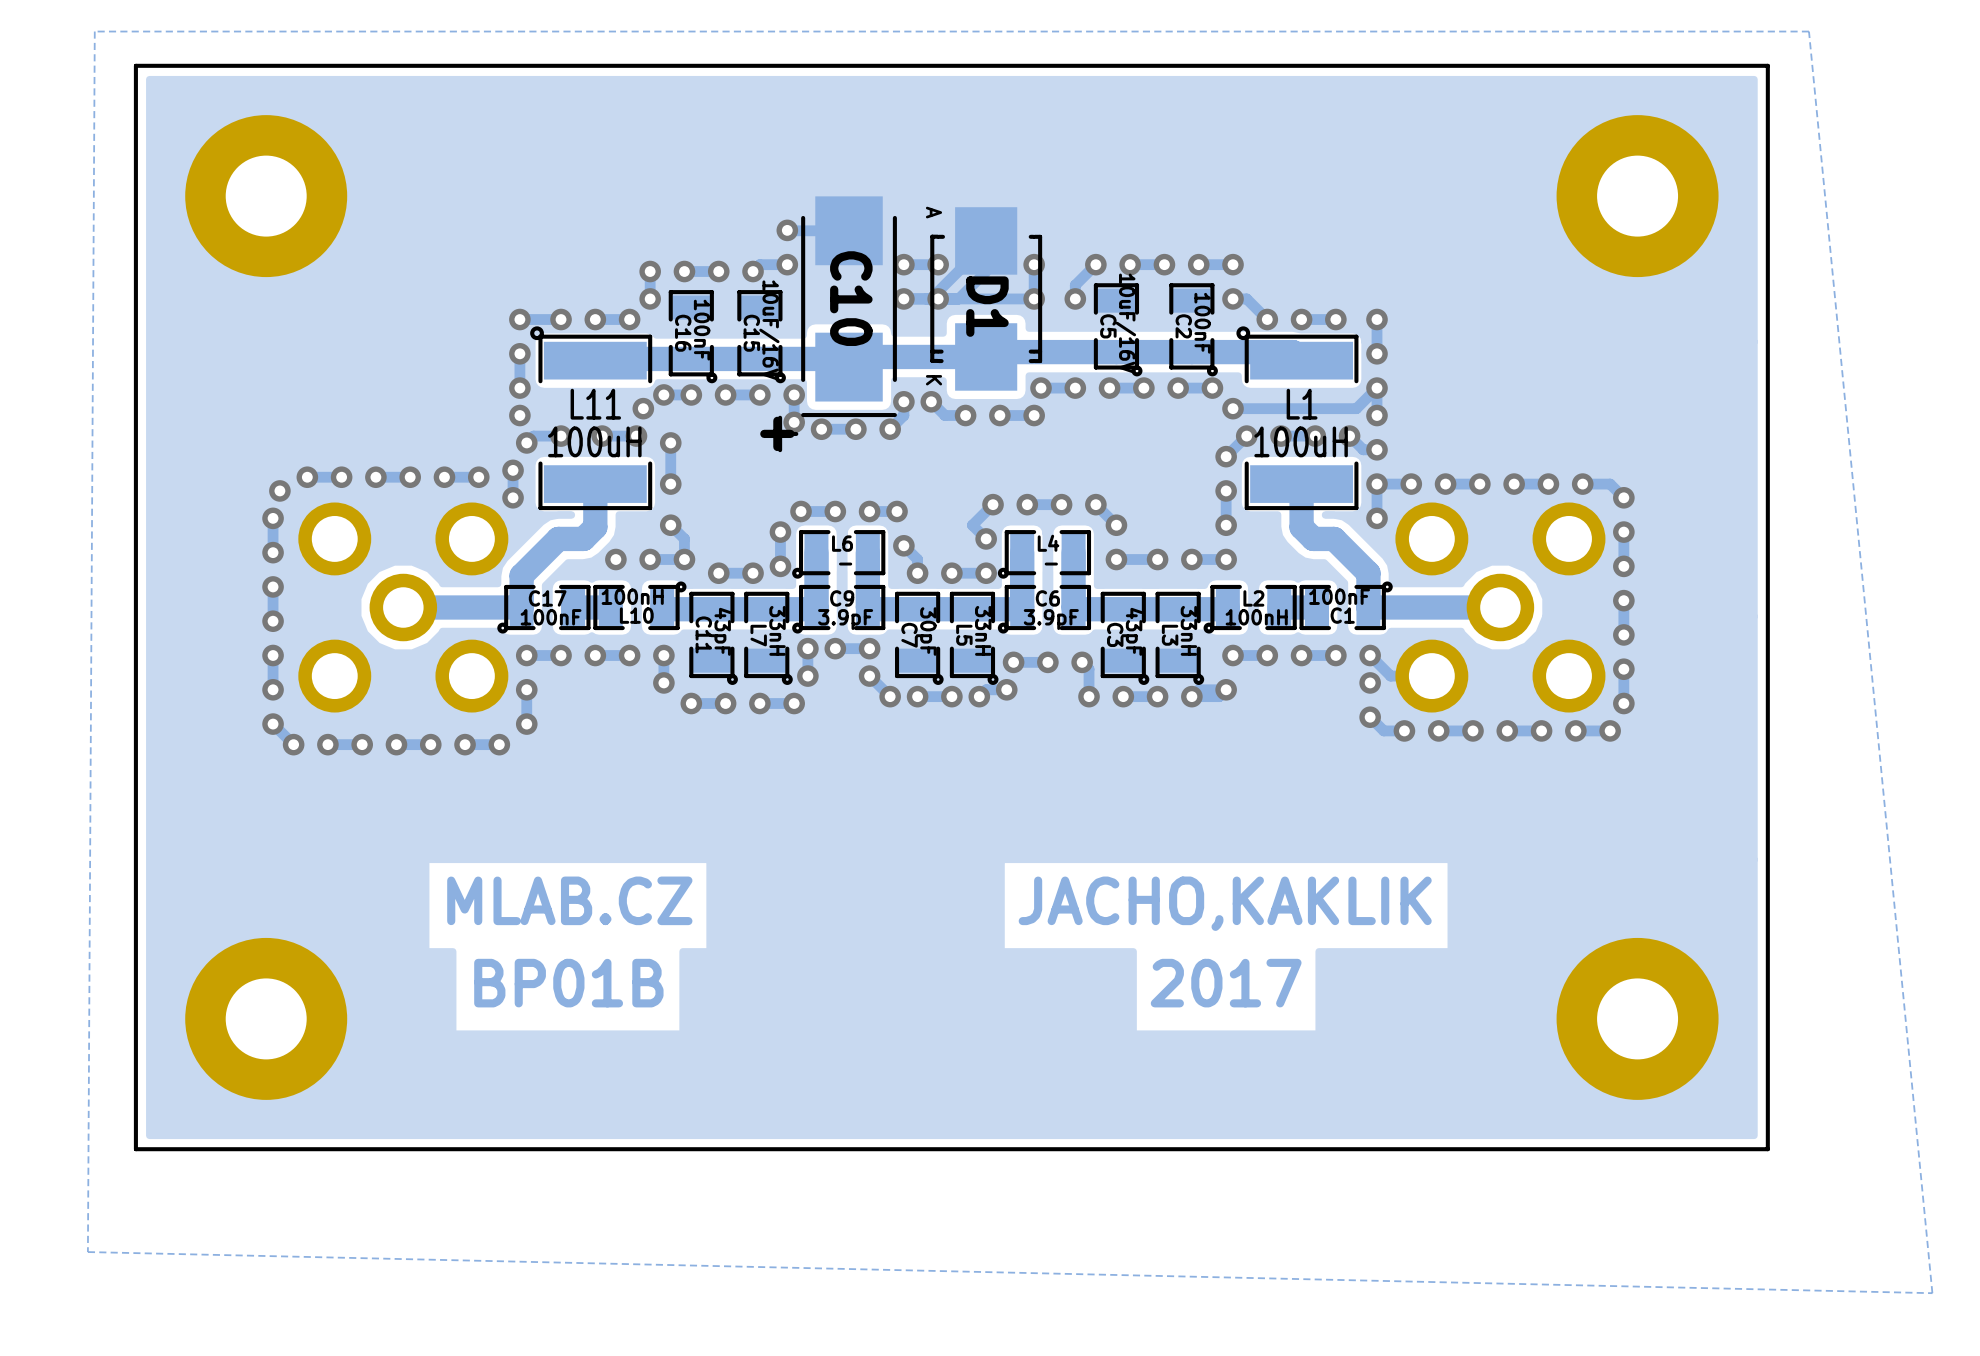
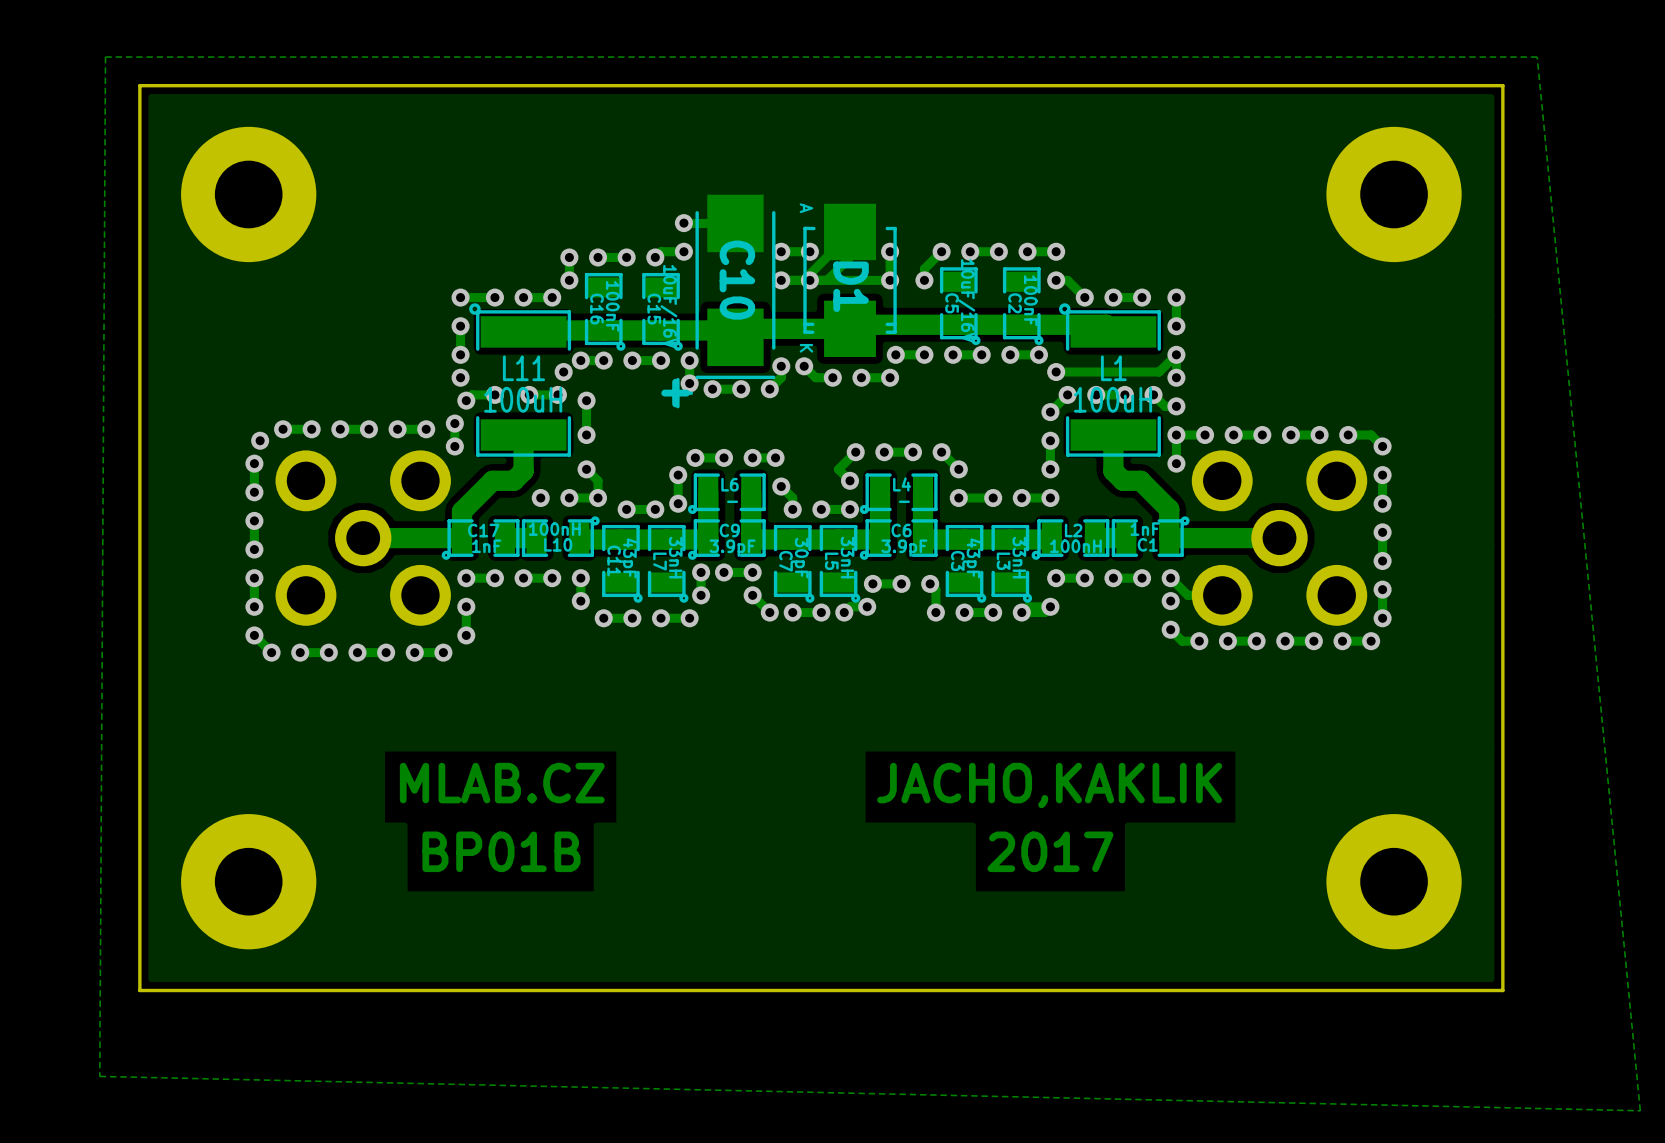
C1 value: 100nF (1339, 596) -> 1nF (1145, 529)
C17 value: 100nF (551, 617) -> 1nF (486, 546)

